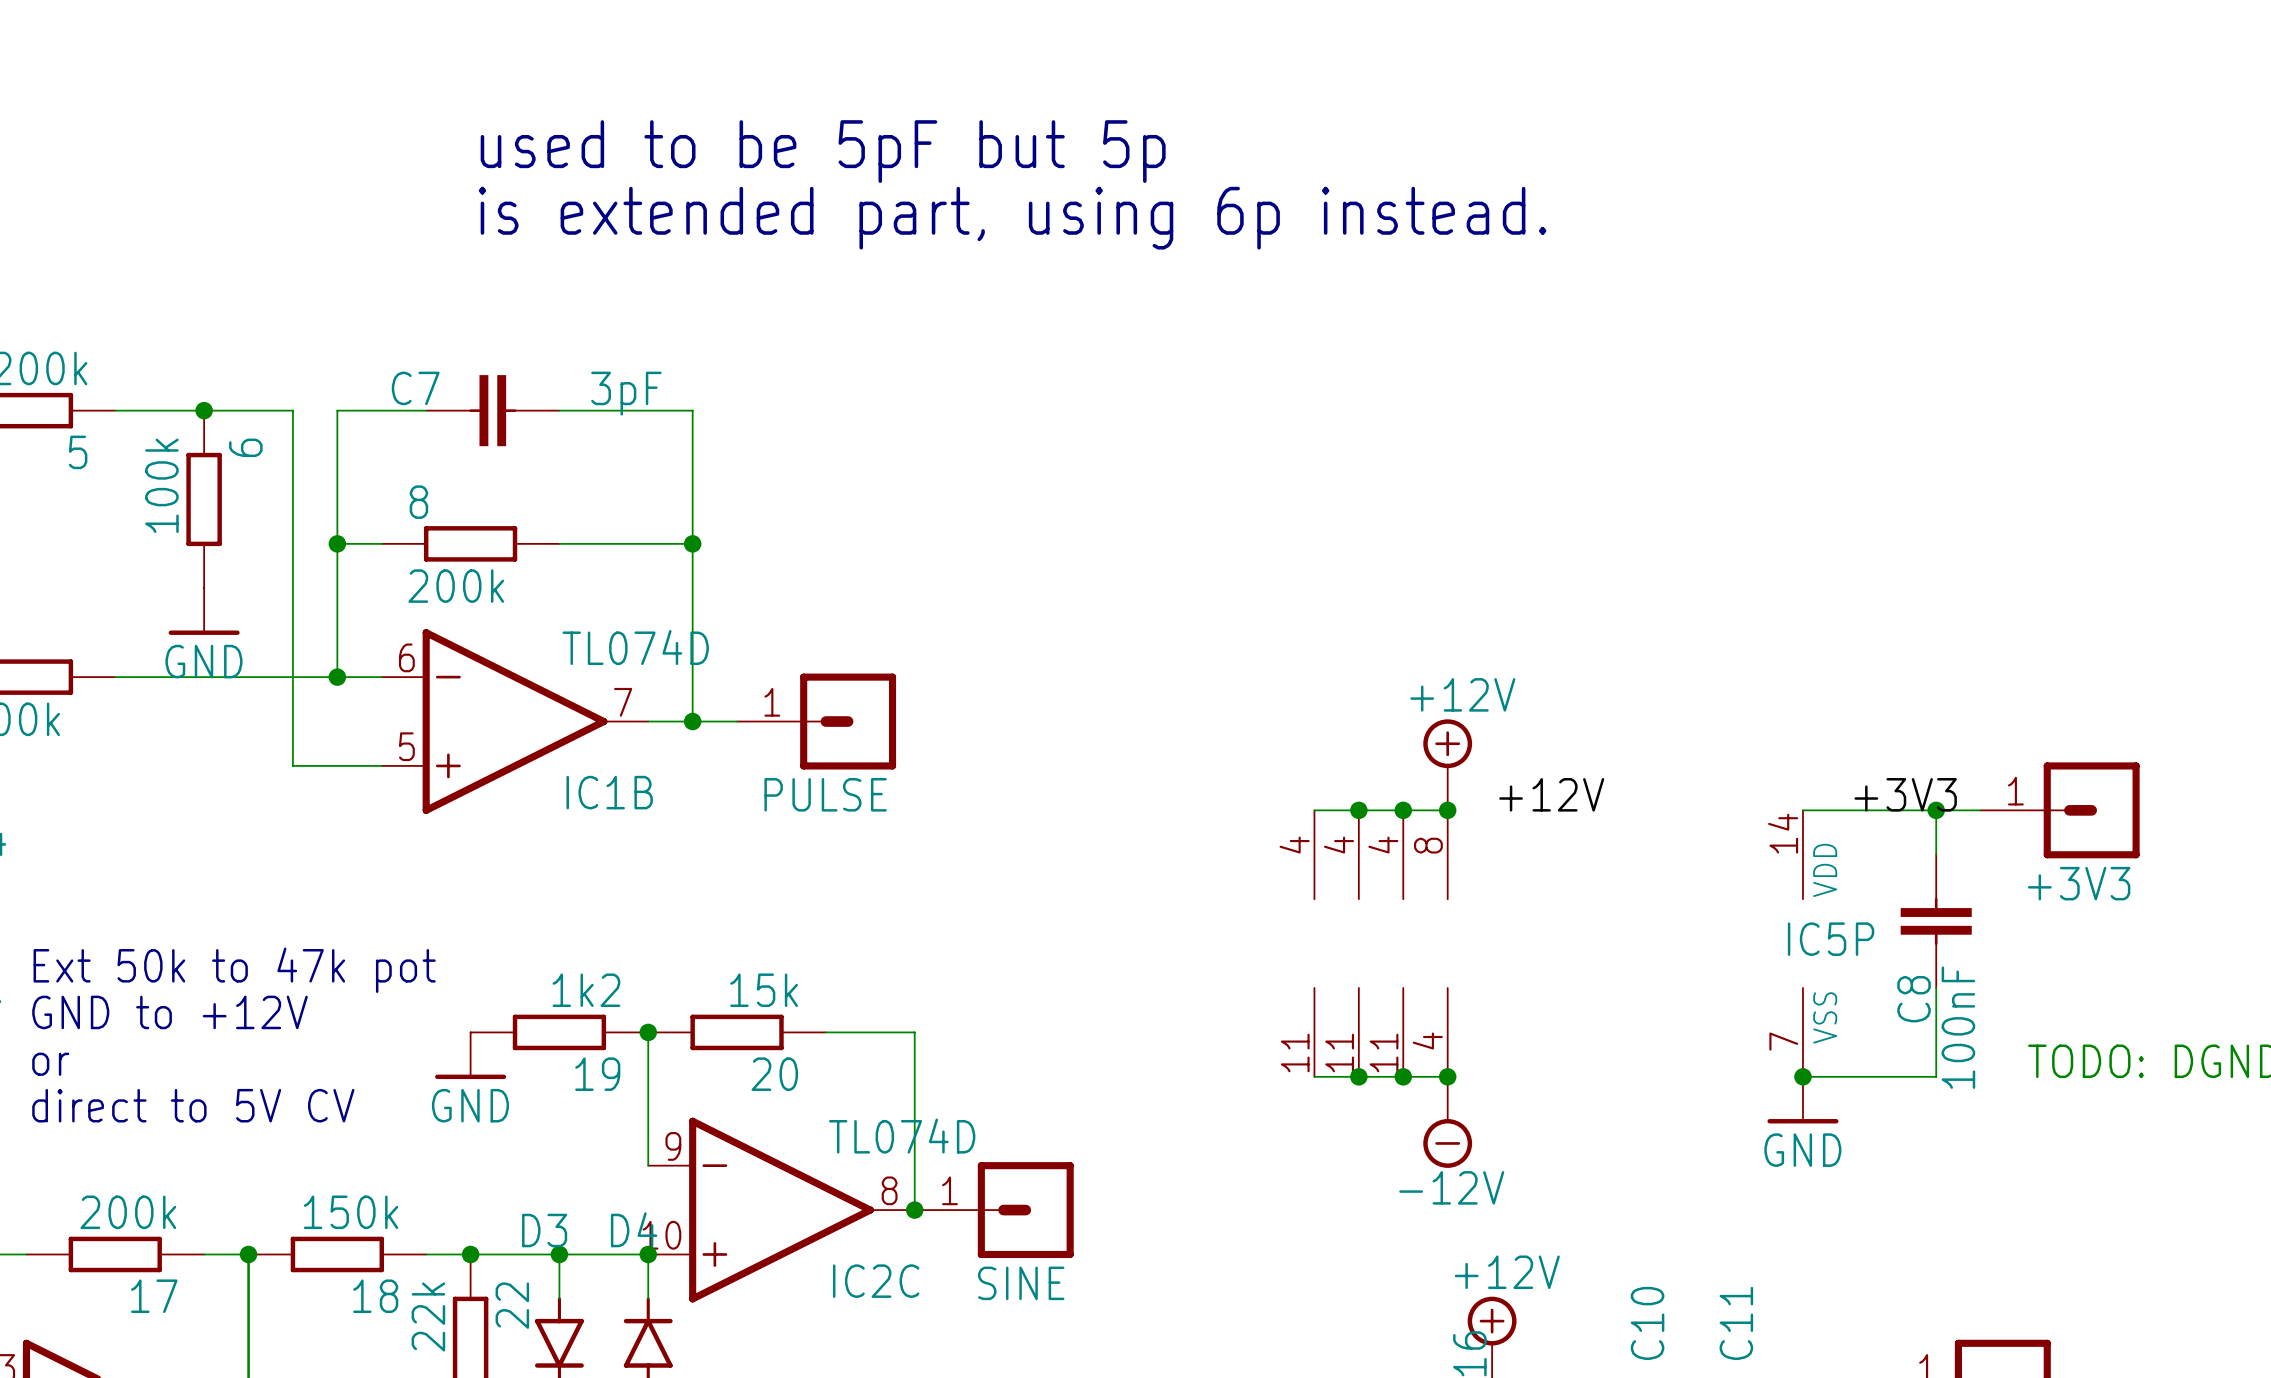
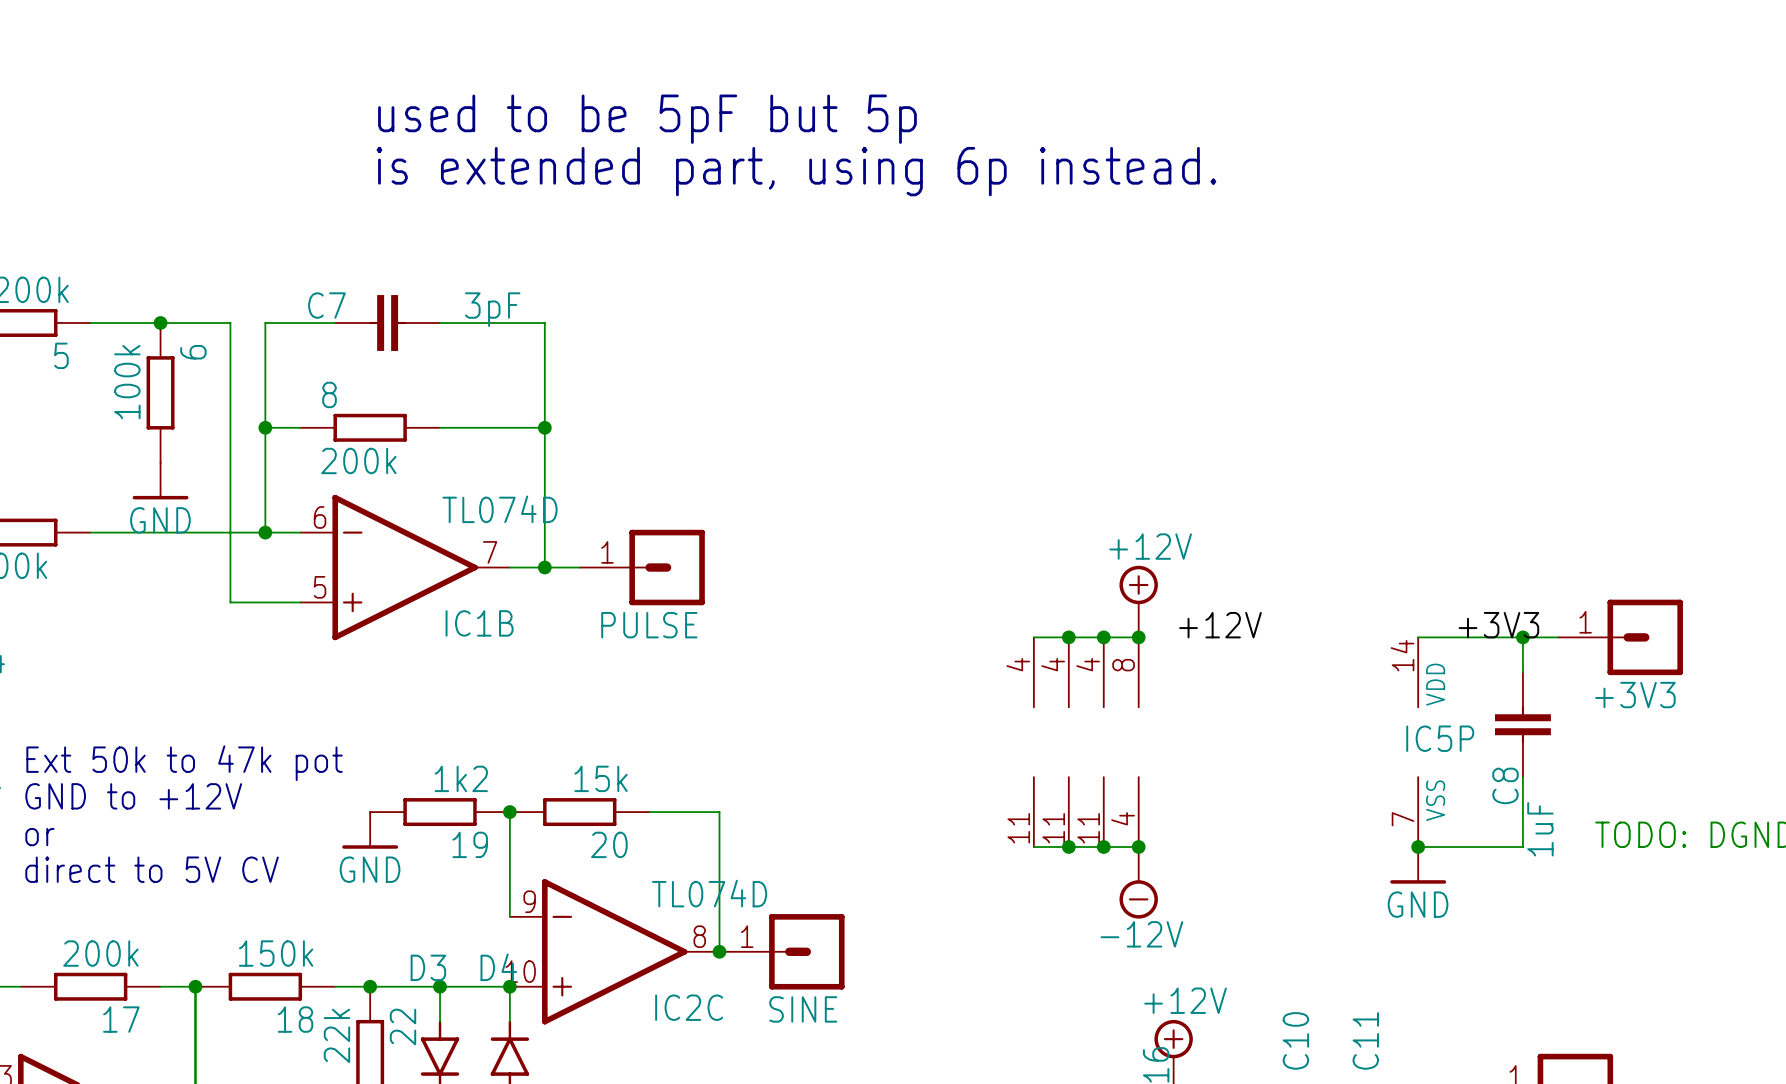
C8 value: 100nF (1958, 1027) -> 1uF (1540, 829)

